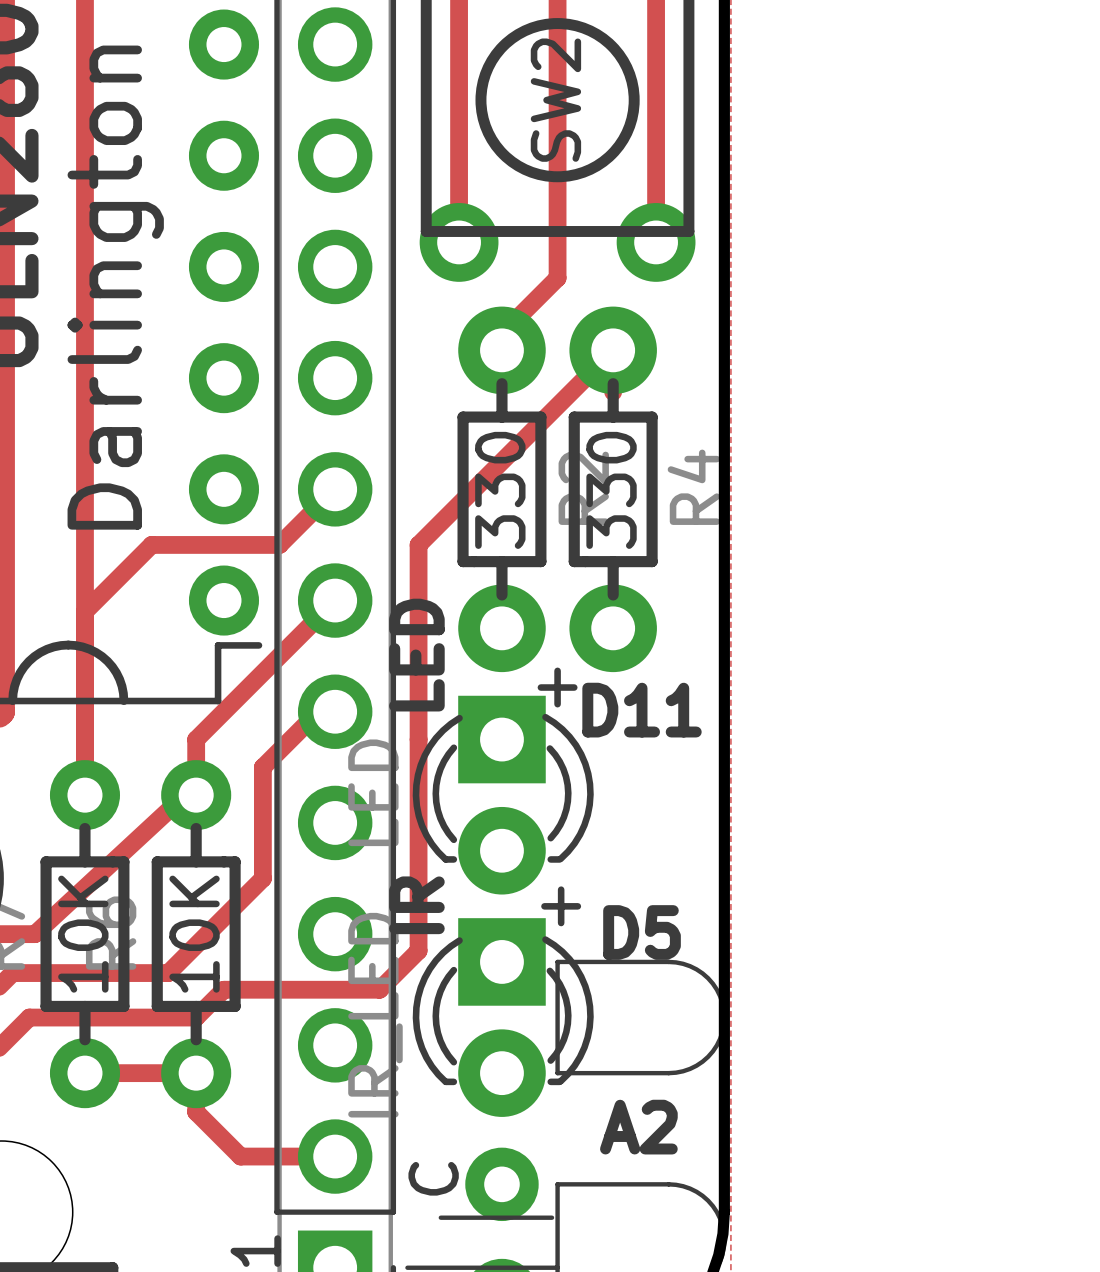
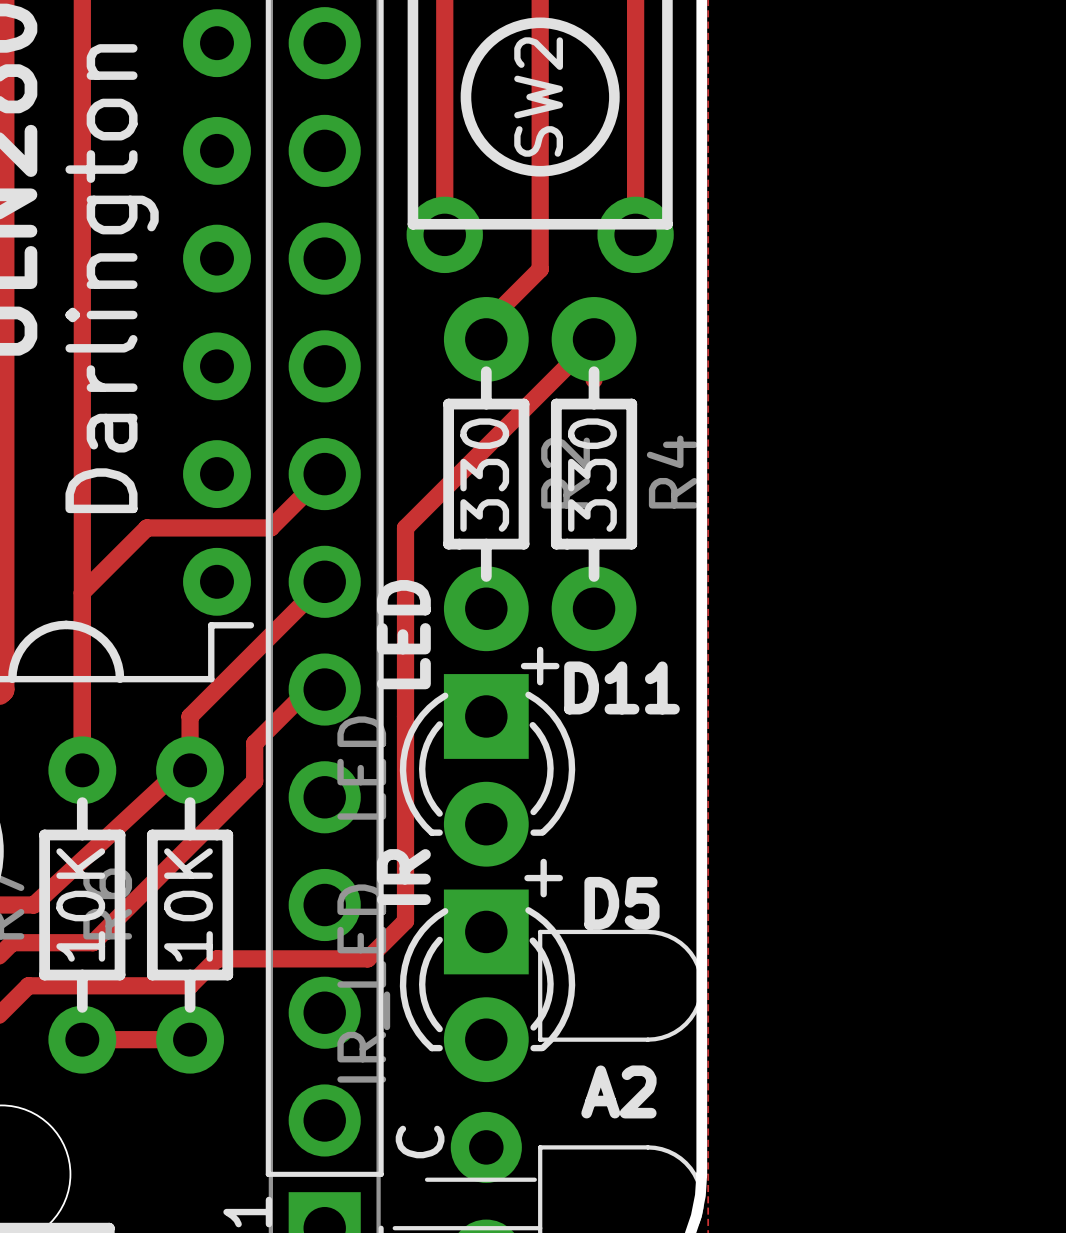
track: (262, 806) (262, 878) (168, 973) (96, 973) -> (254, 781) (93, 942)
track: (196, 1073) (196, 1112) (240, 1156) (335, 1156) -> none

